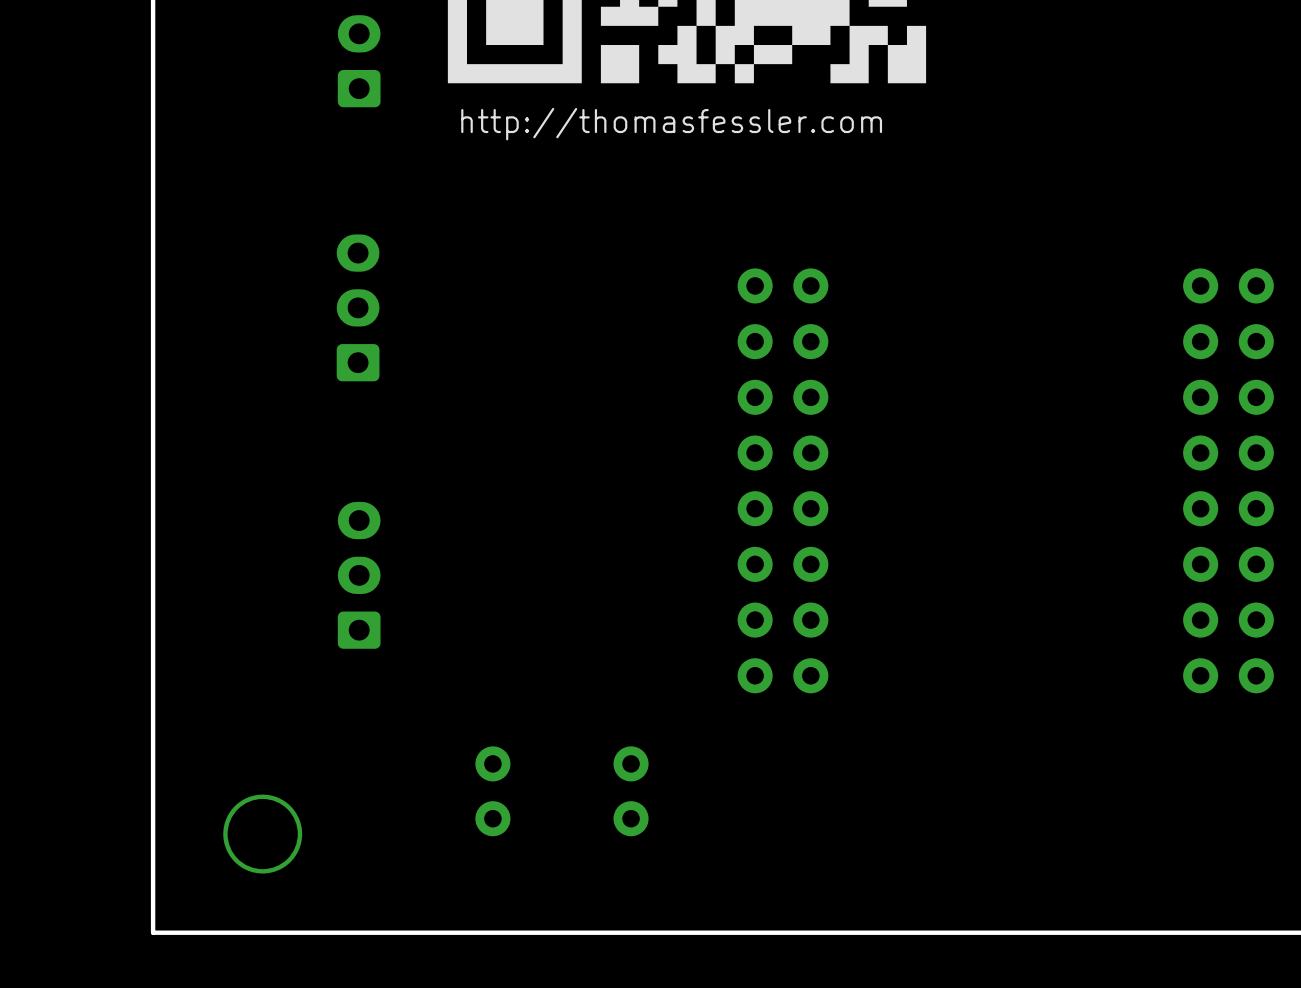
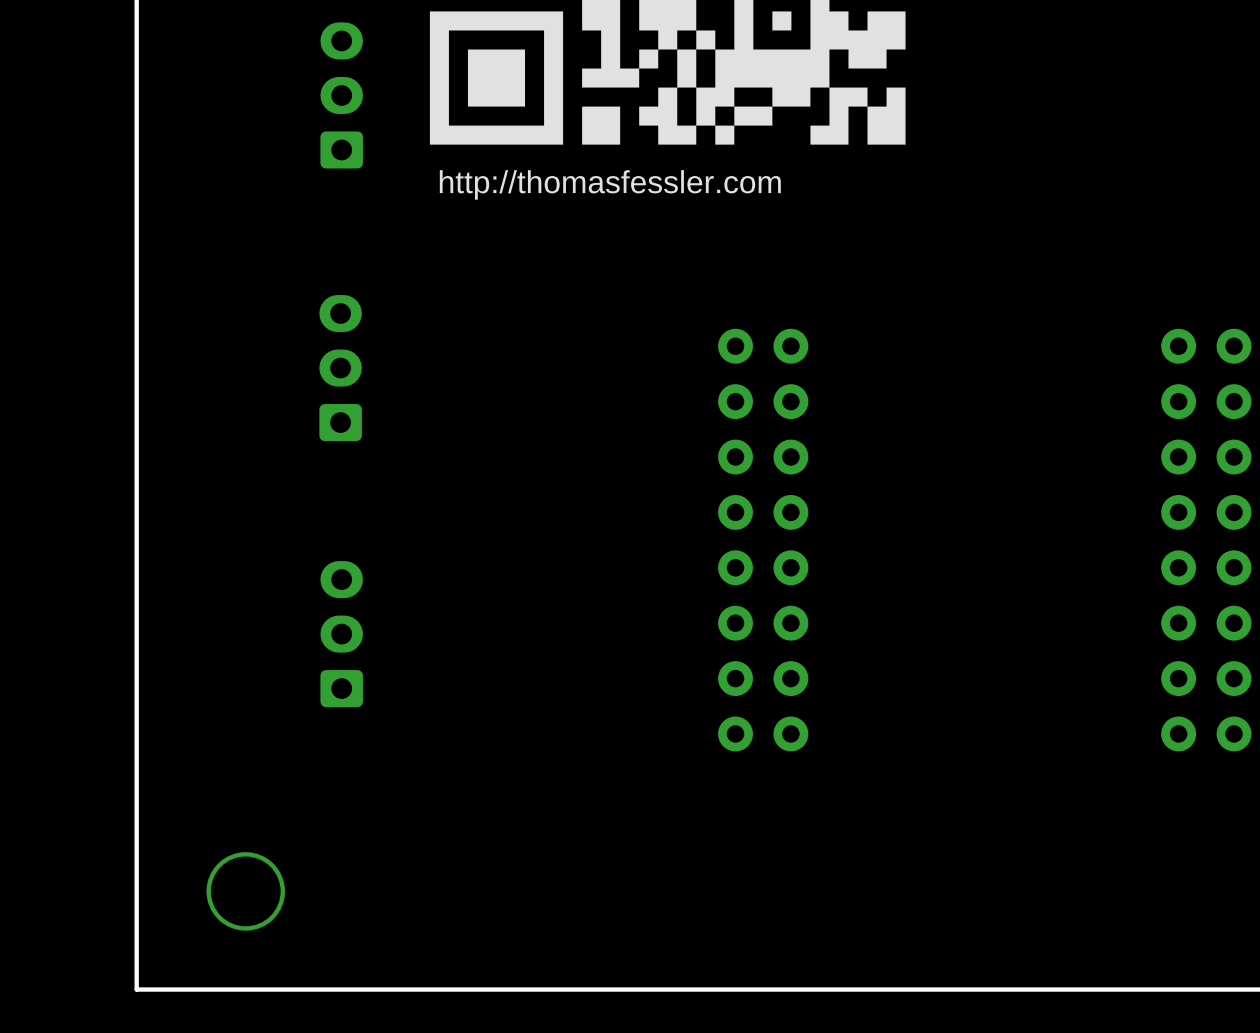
part: (492, 791) -> none
part: (631, 791) -> none

